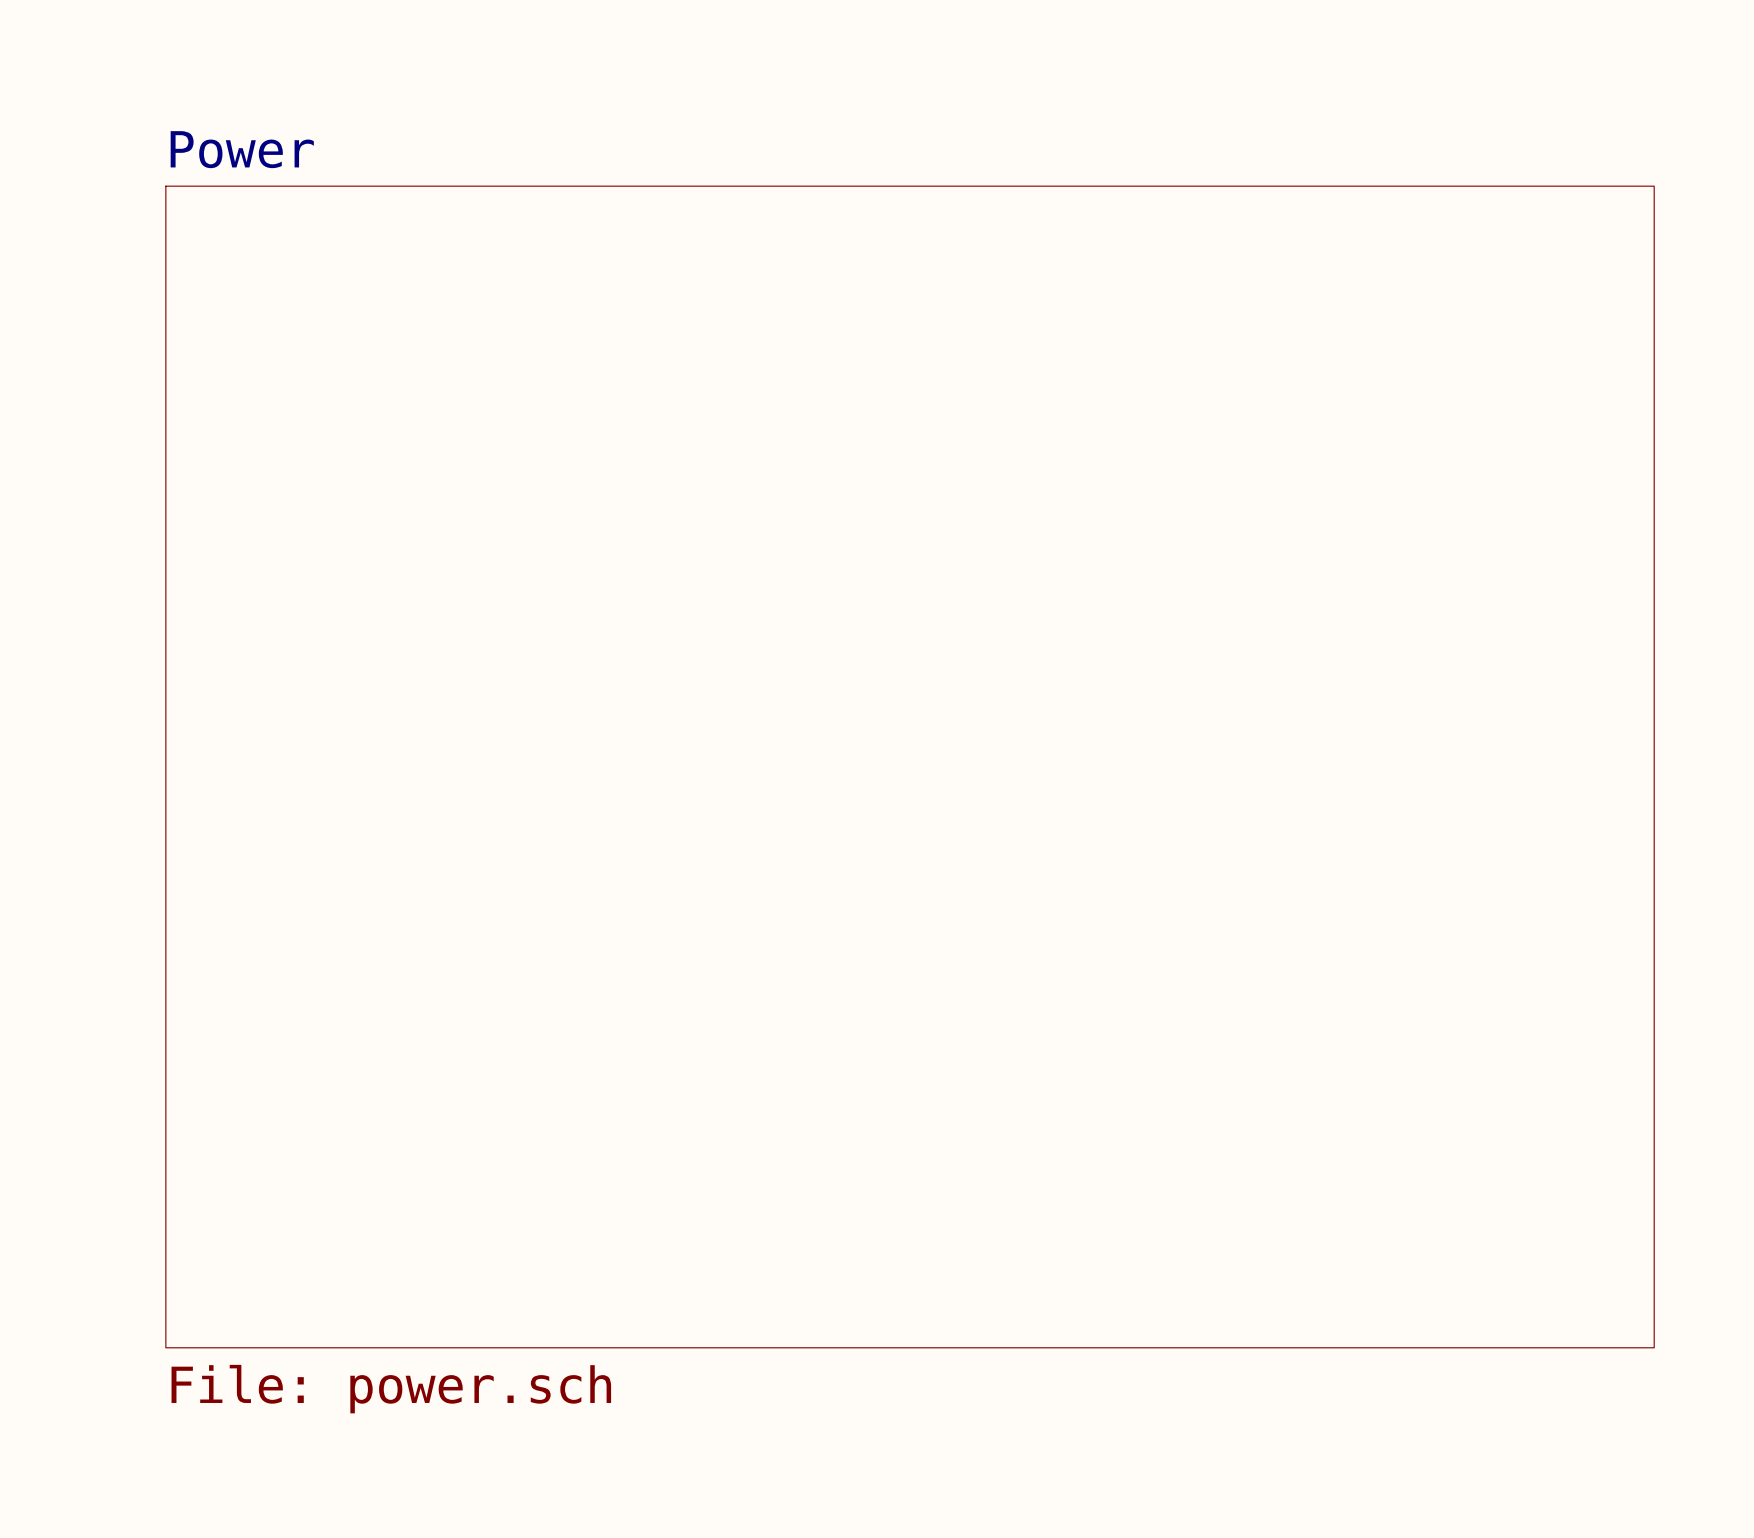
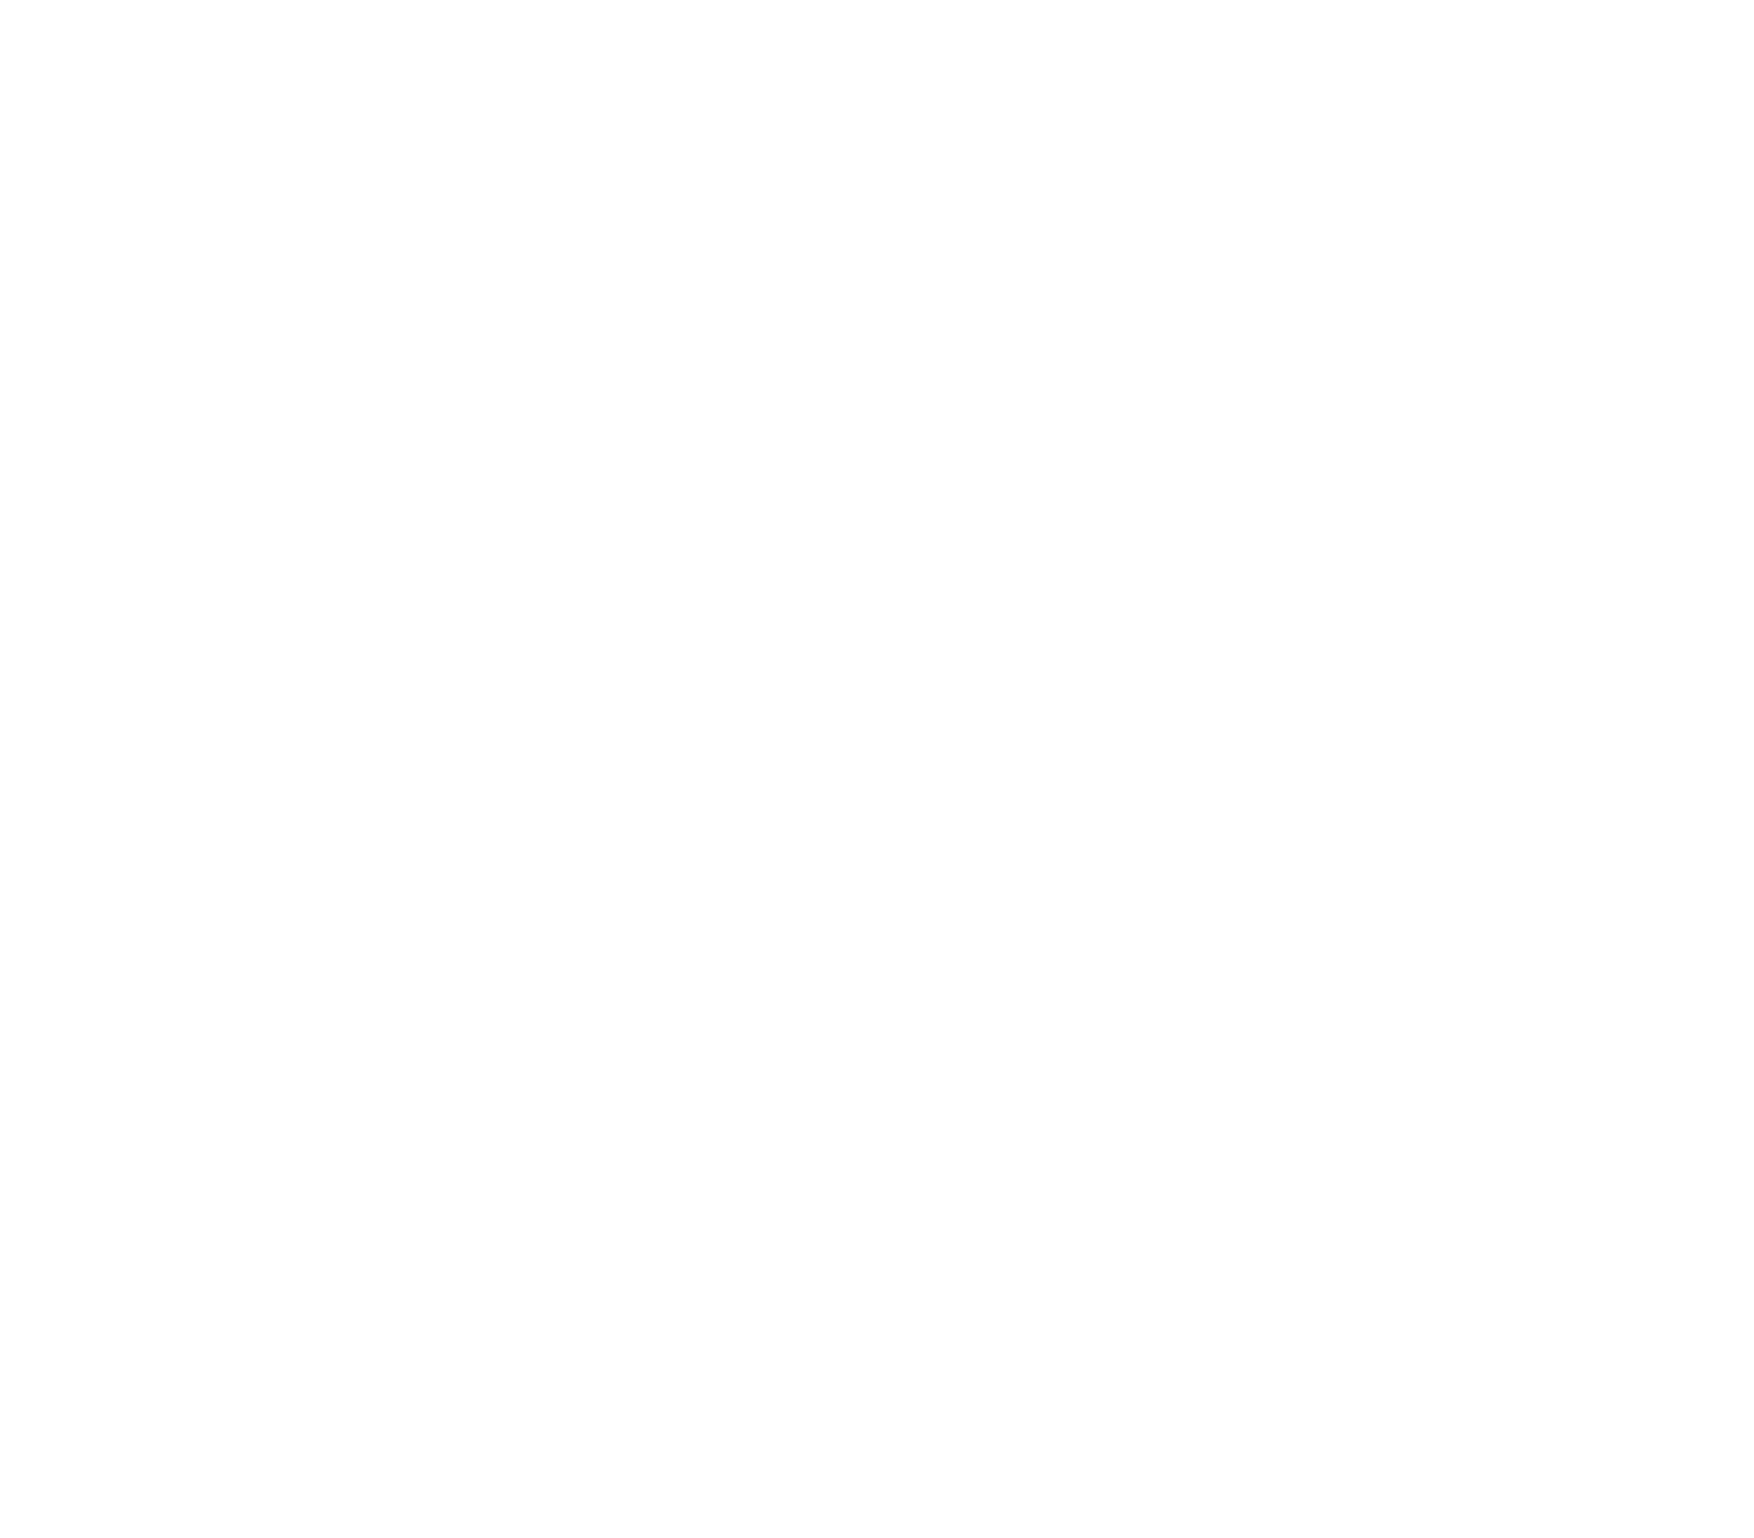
sheet Power: File: power.sch (910, 766) -> none

